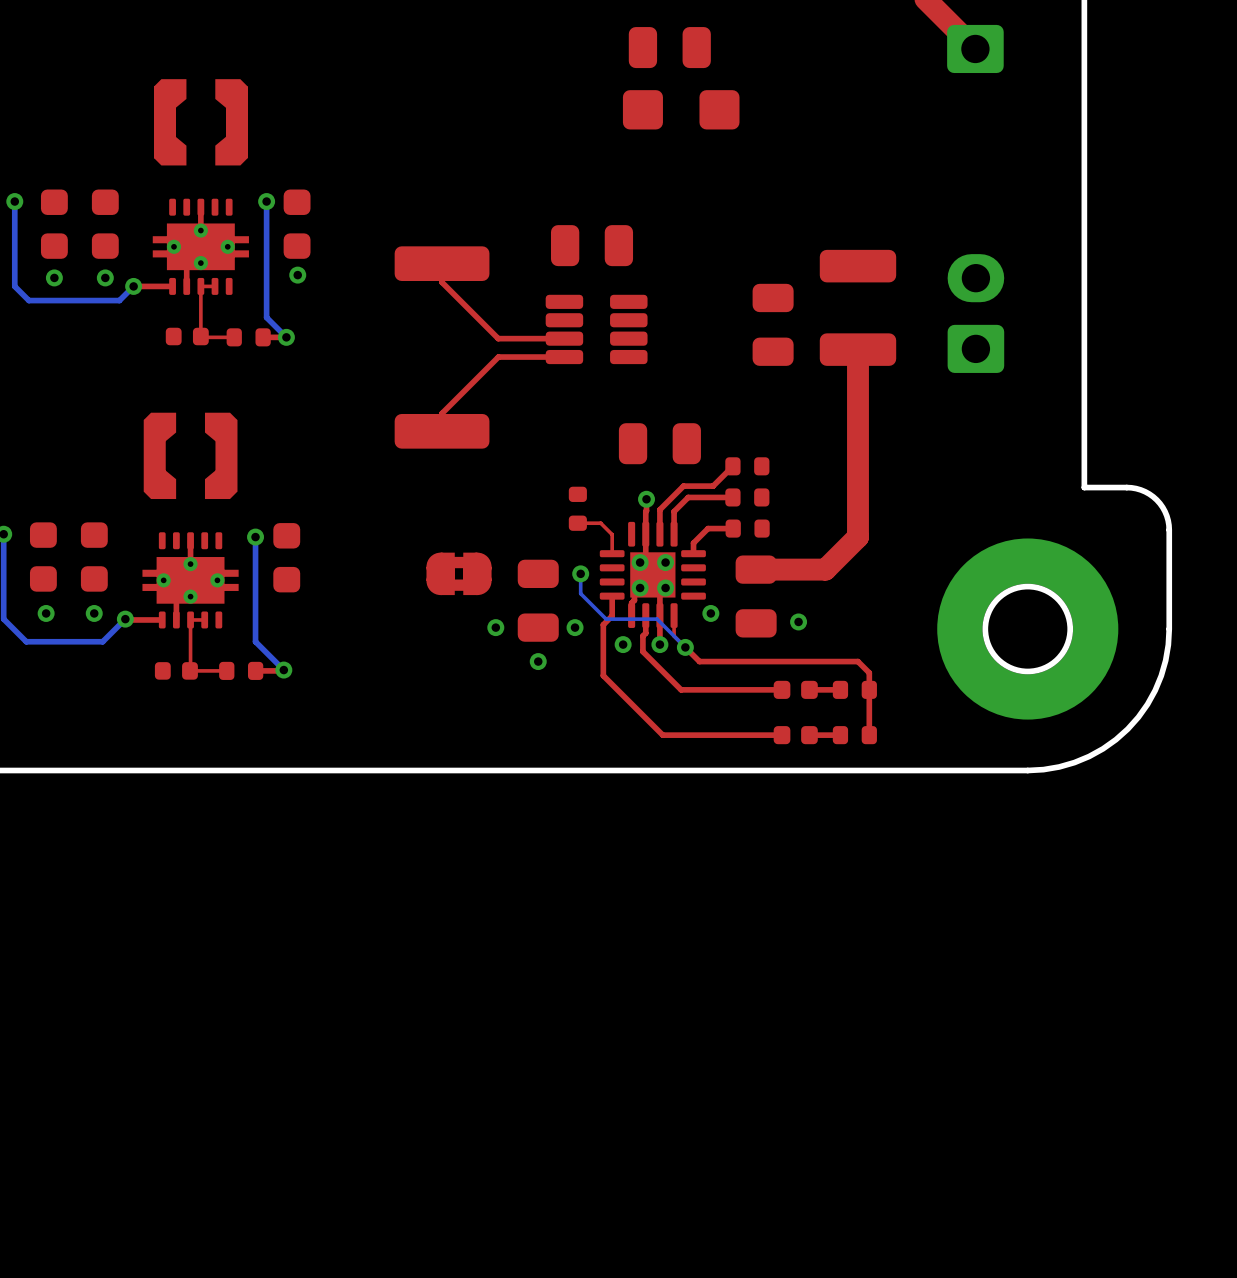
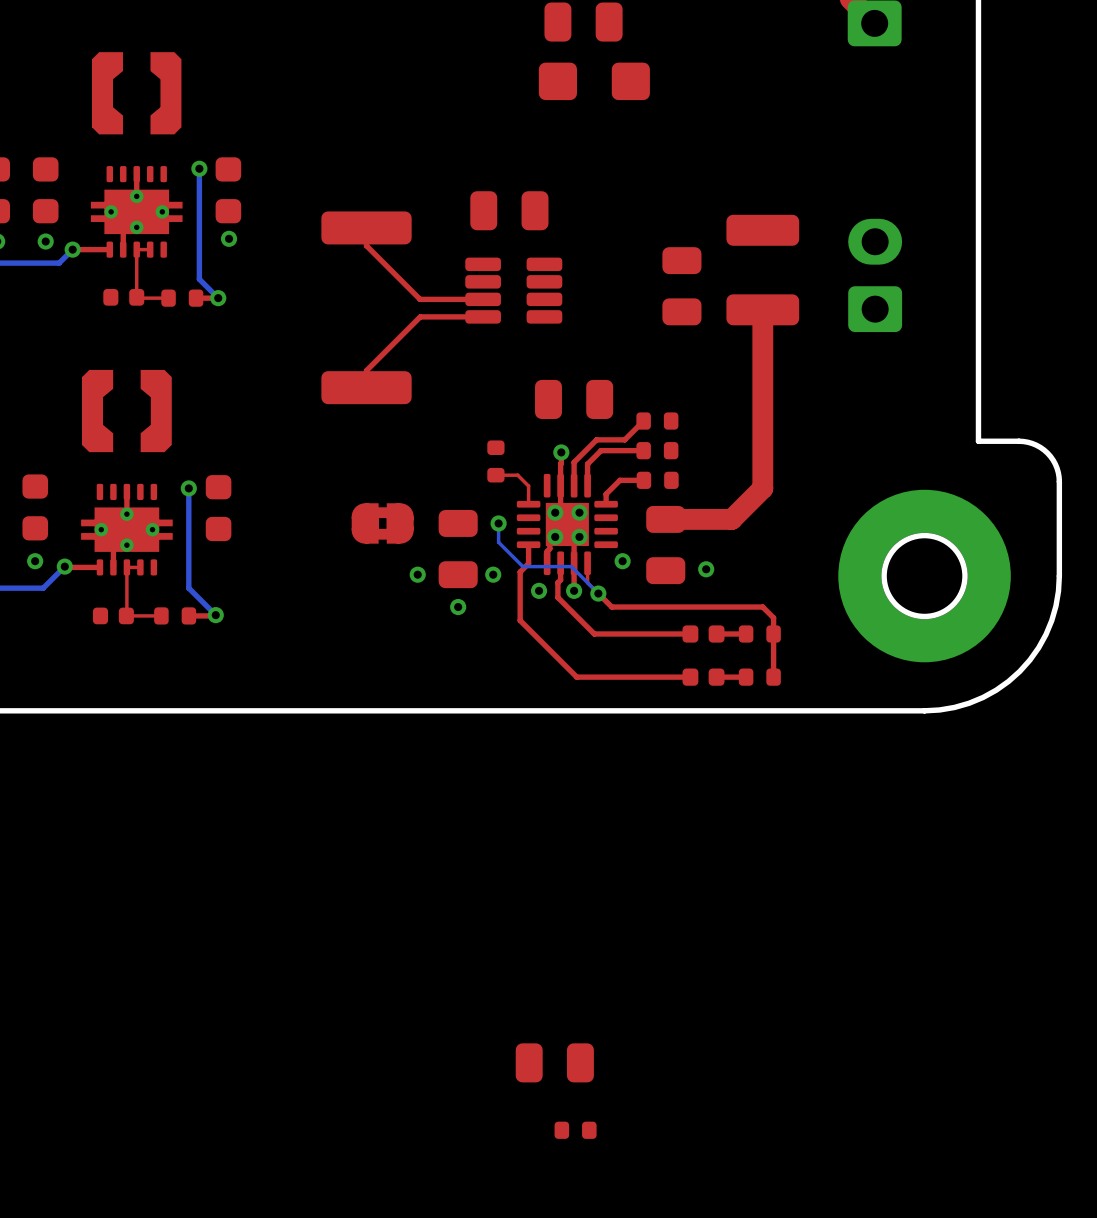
part: none -> (554, 1062)
part: none -> (575, 1130)

